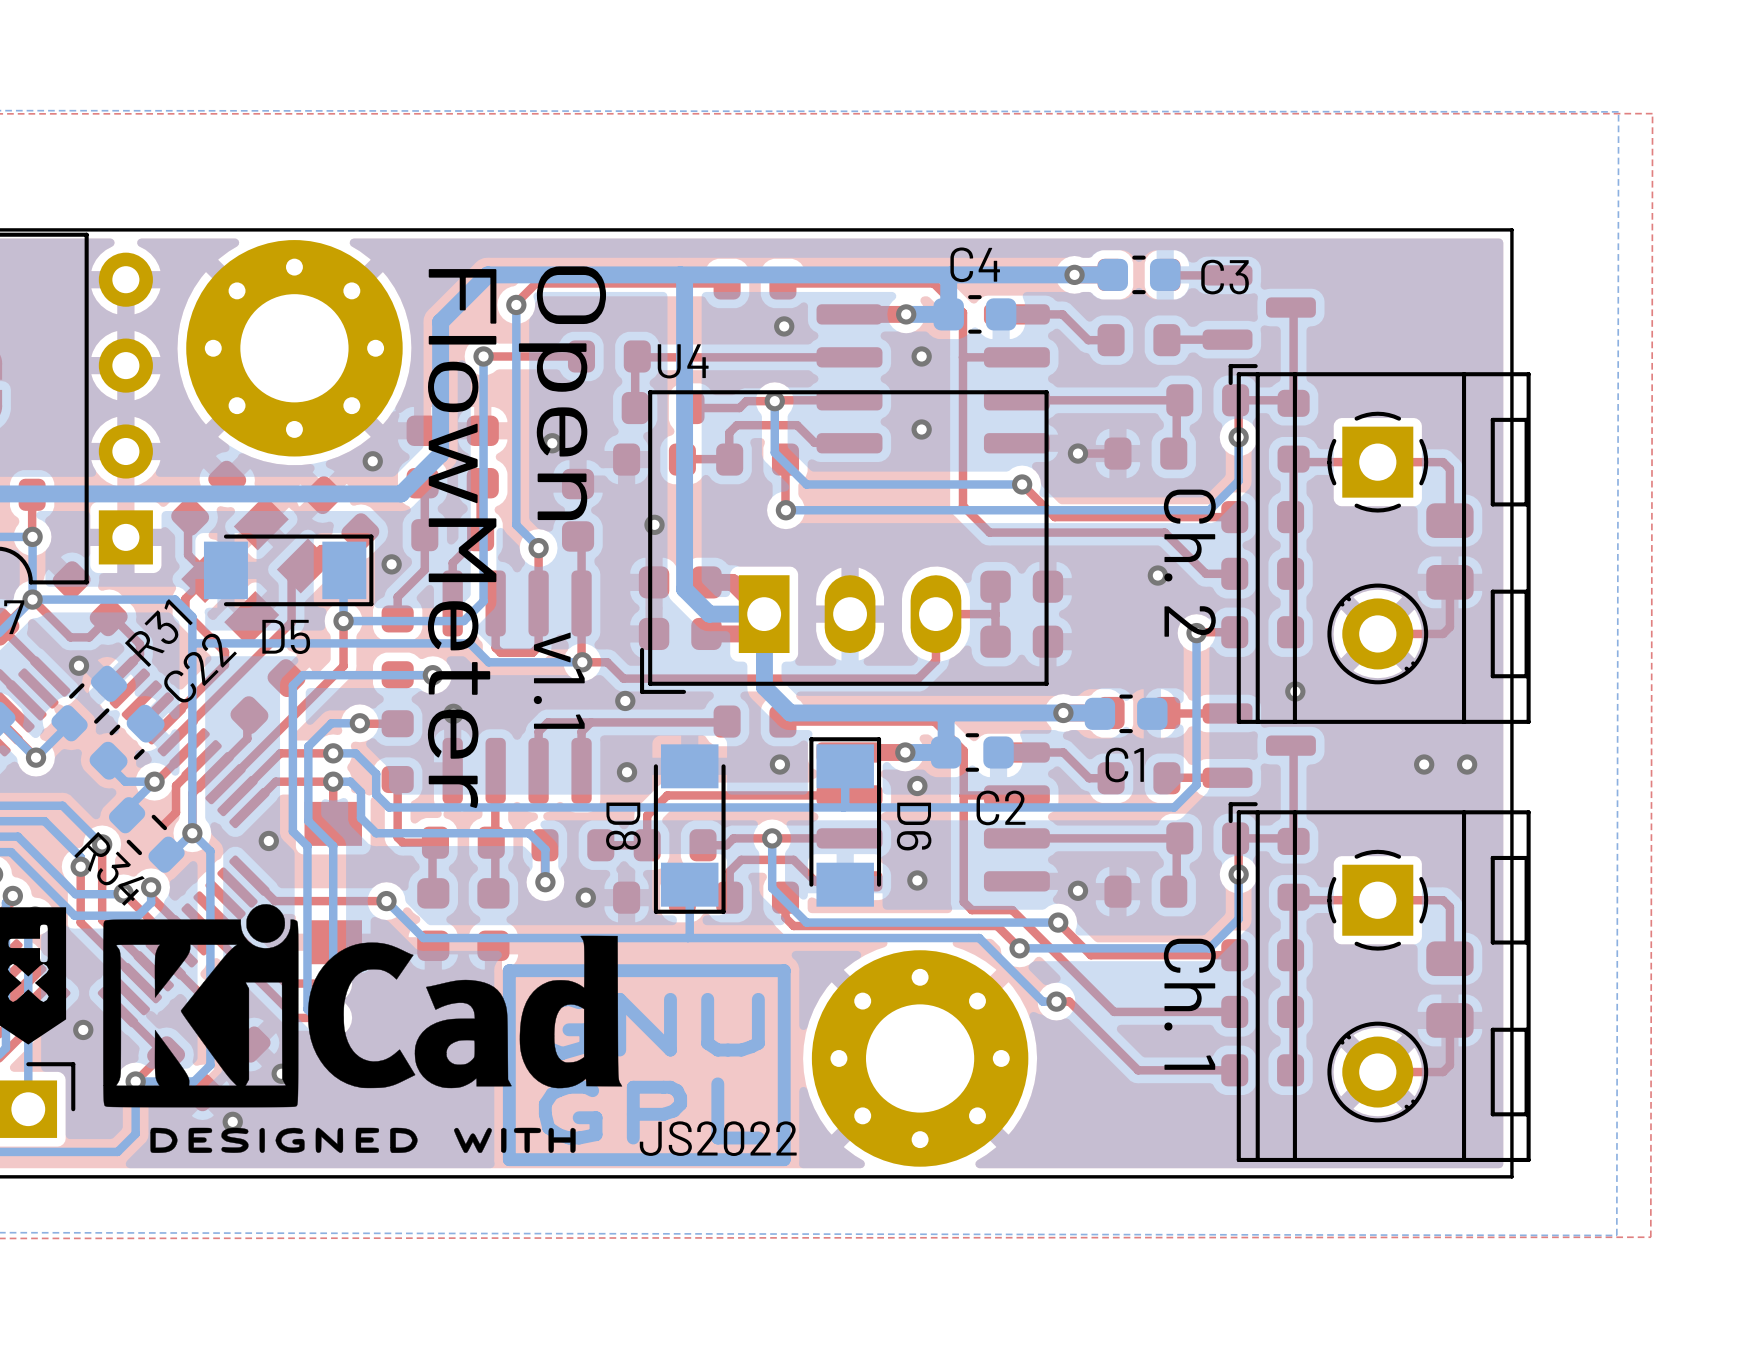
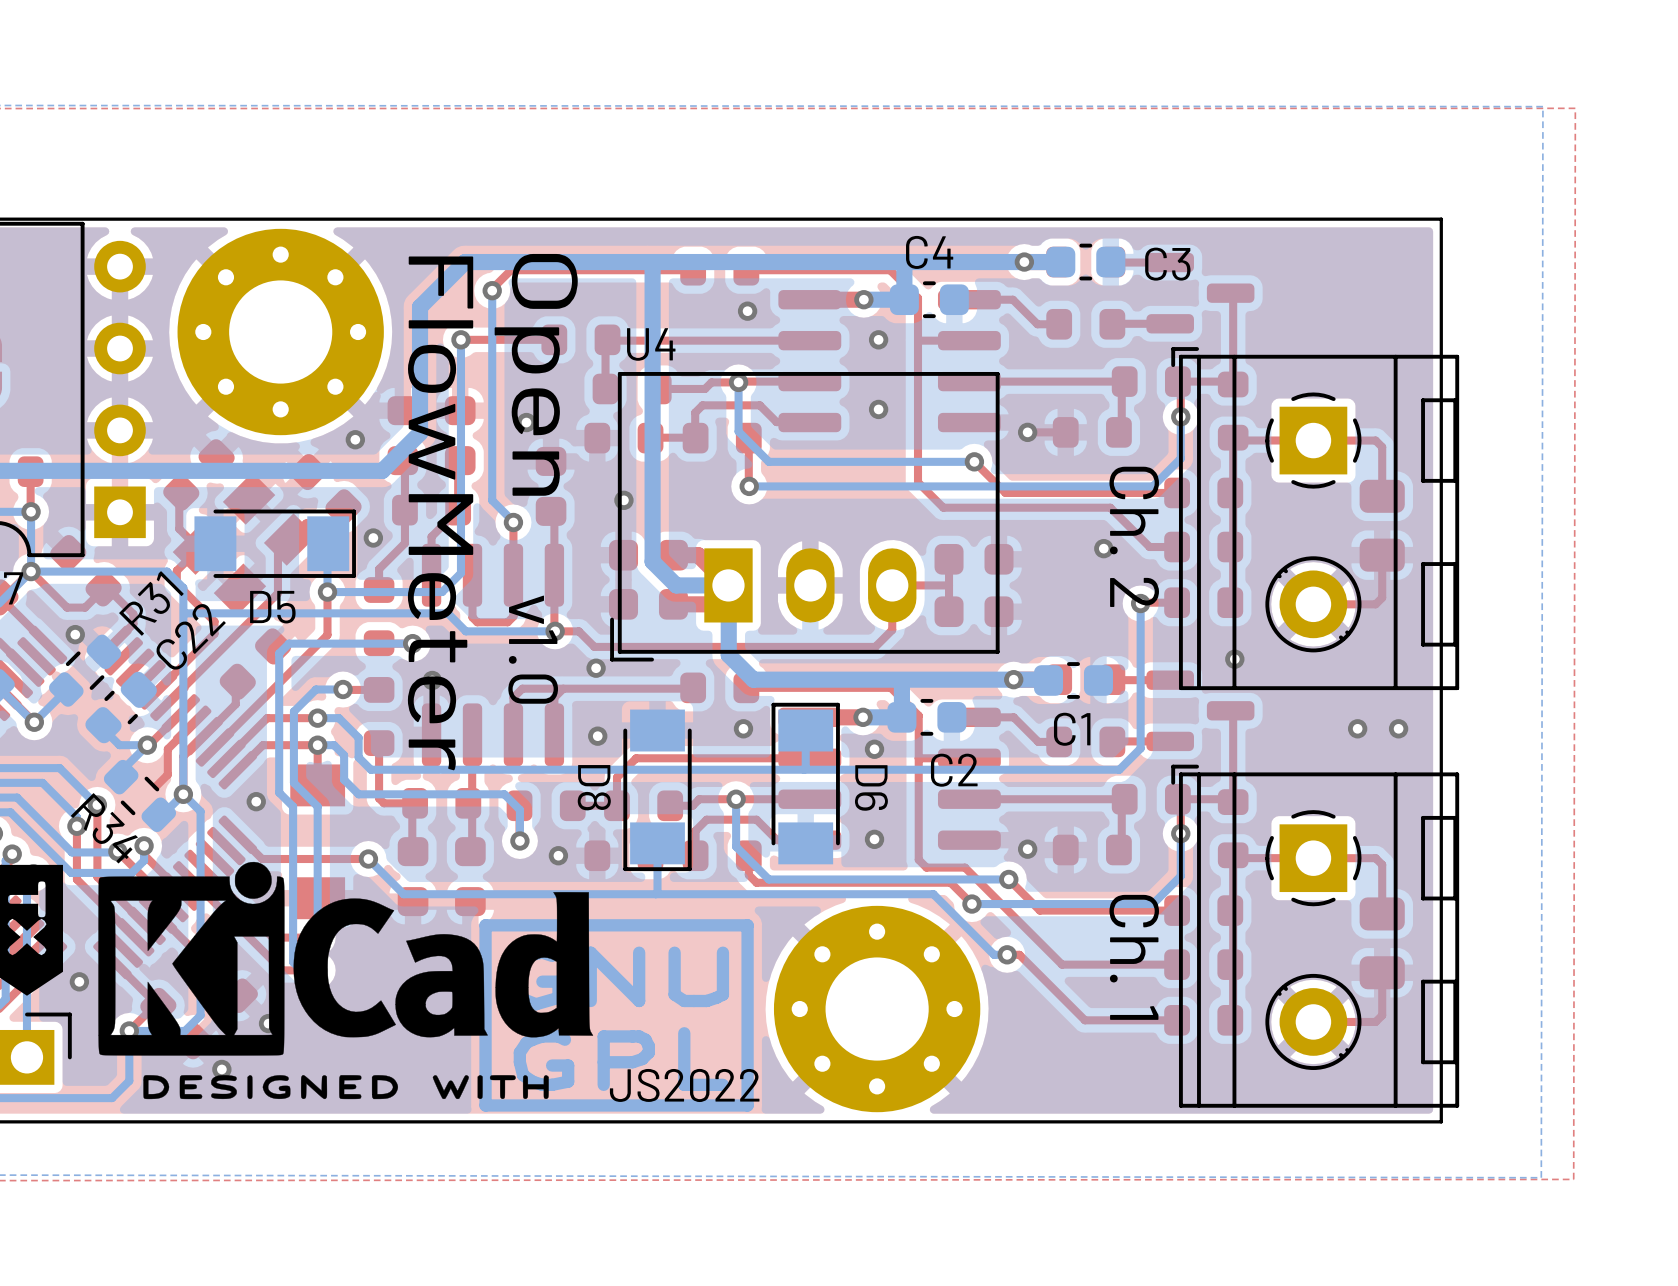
text: v1.1 (559, 680) -> v1.0 (533, 649)

